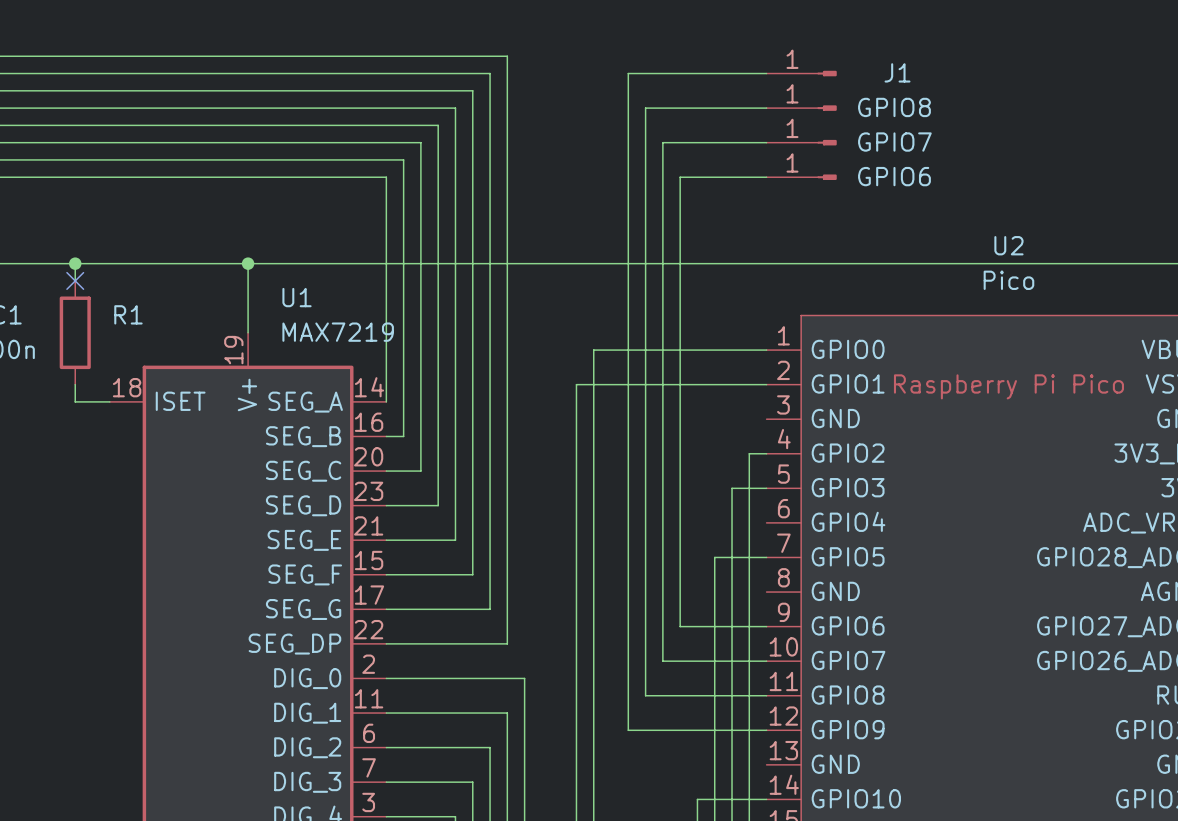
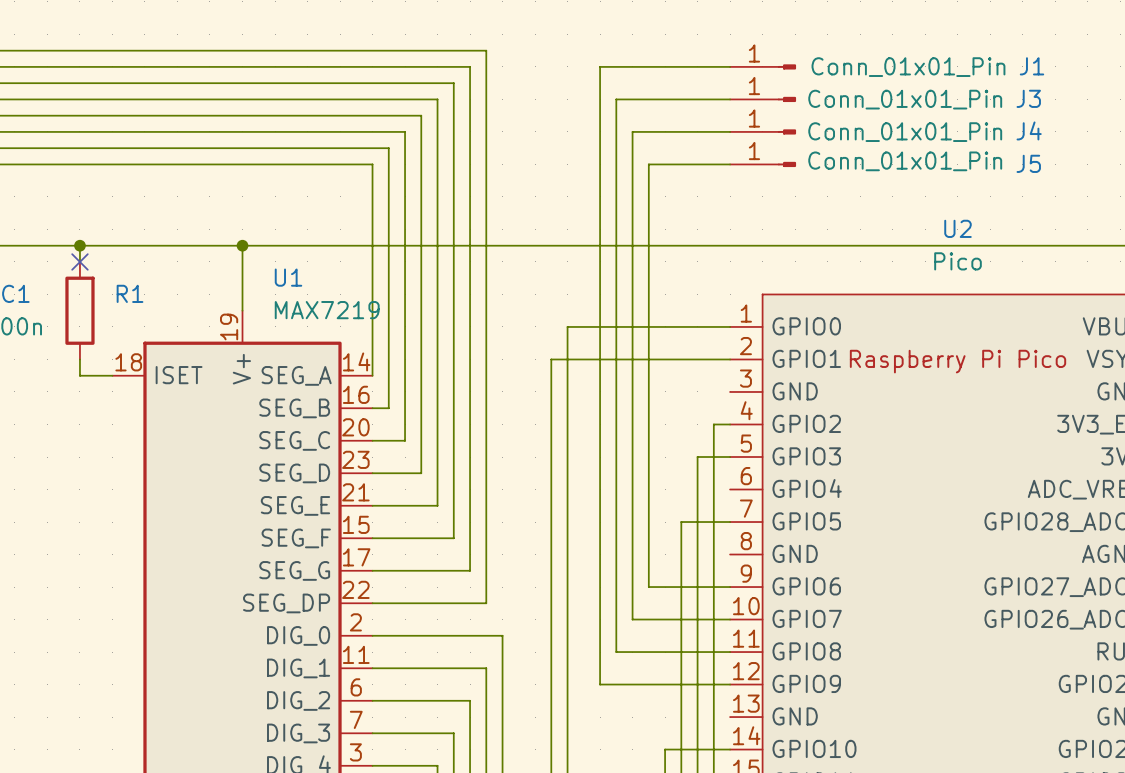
J1 name position: J1 (897, 72) -> J1 (1031, 66)
J1 value: none -> Conn_01x01_Pin (908, 67)
GPIO8 name: GPIO8 (894, 107) -> J3 (1028, 98)
GPIO8 value: none -> Conn_01x01_Pin (905, 99)
GPIO7 name: GPIO7 (894, 142) -> J4 (1029, 130)
GPIO7 value: none -> Conn_01x01_Pin (905, 132)
GPIO6 value: none -> Conn_01x01_Pin (905, 161)
GPIO6 name: GPIO6 (894, 176) -> J5 (1028, 163)

